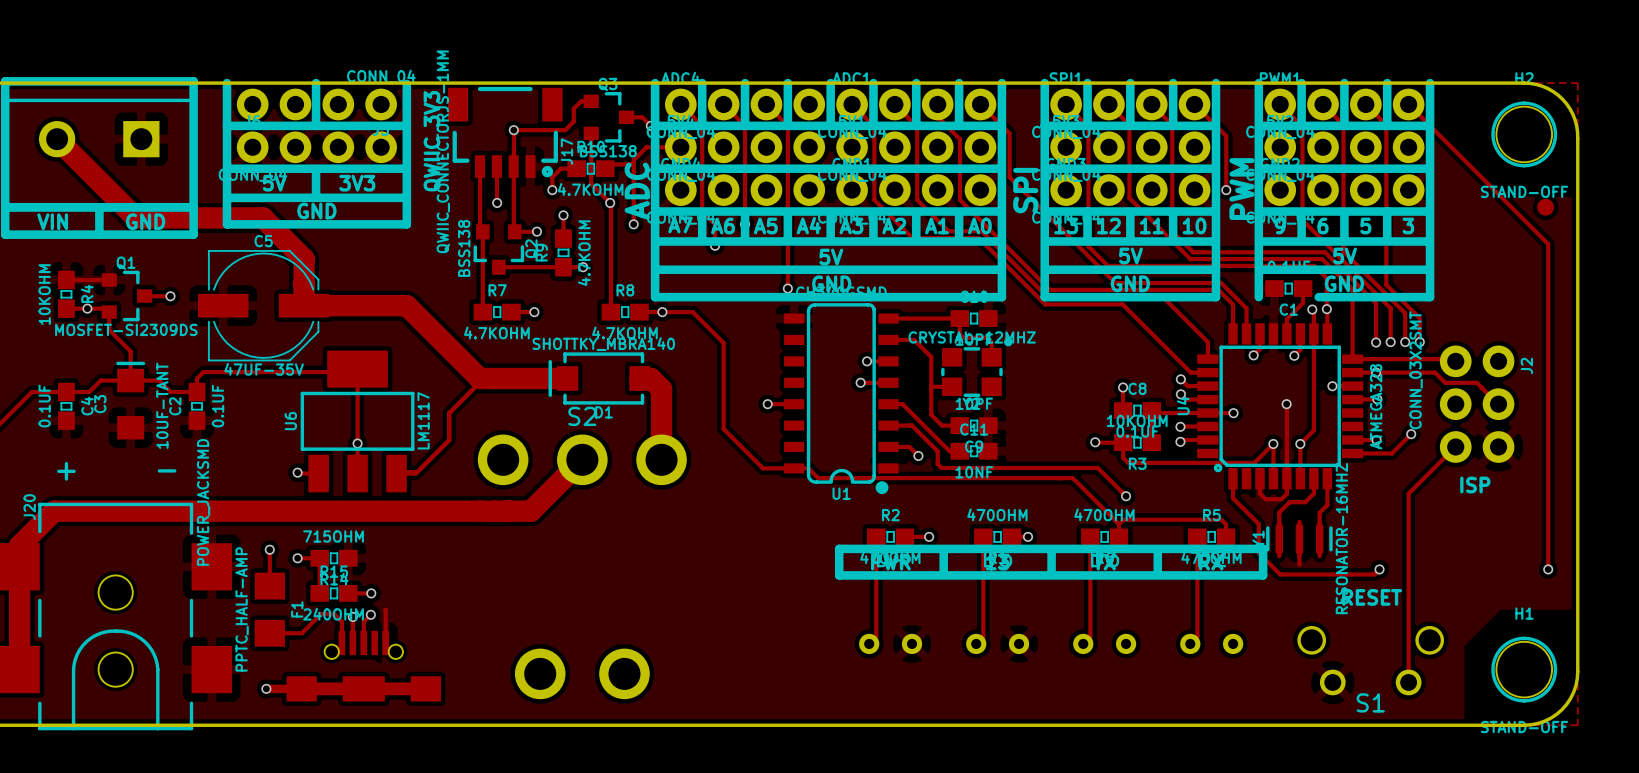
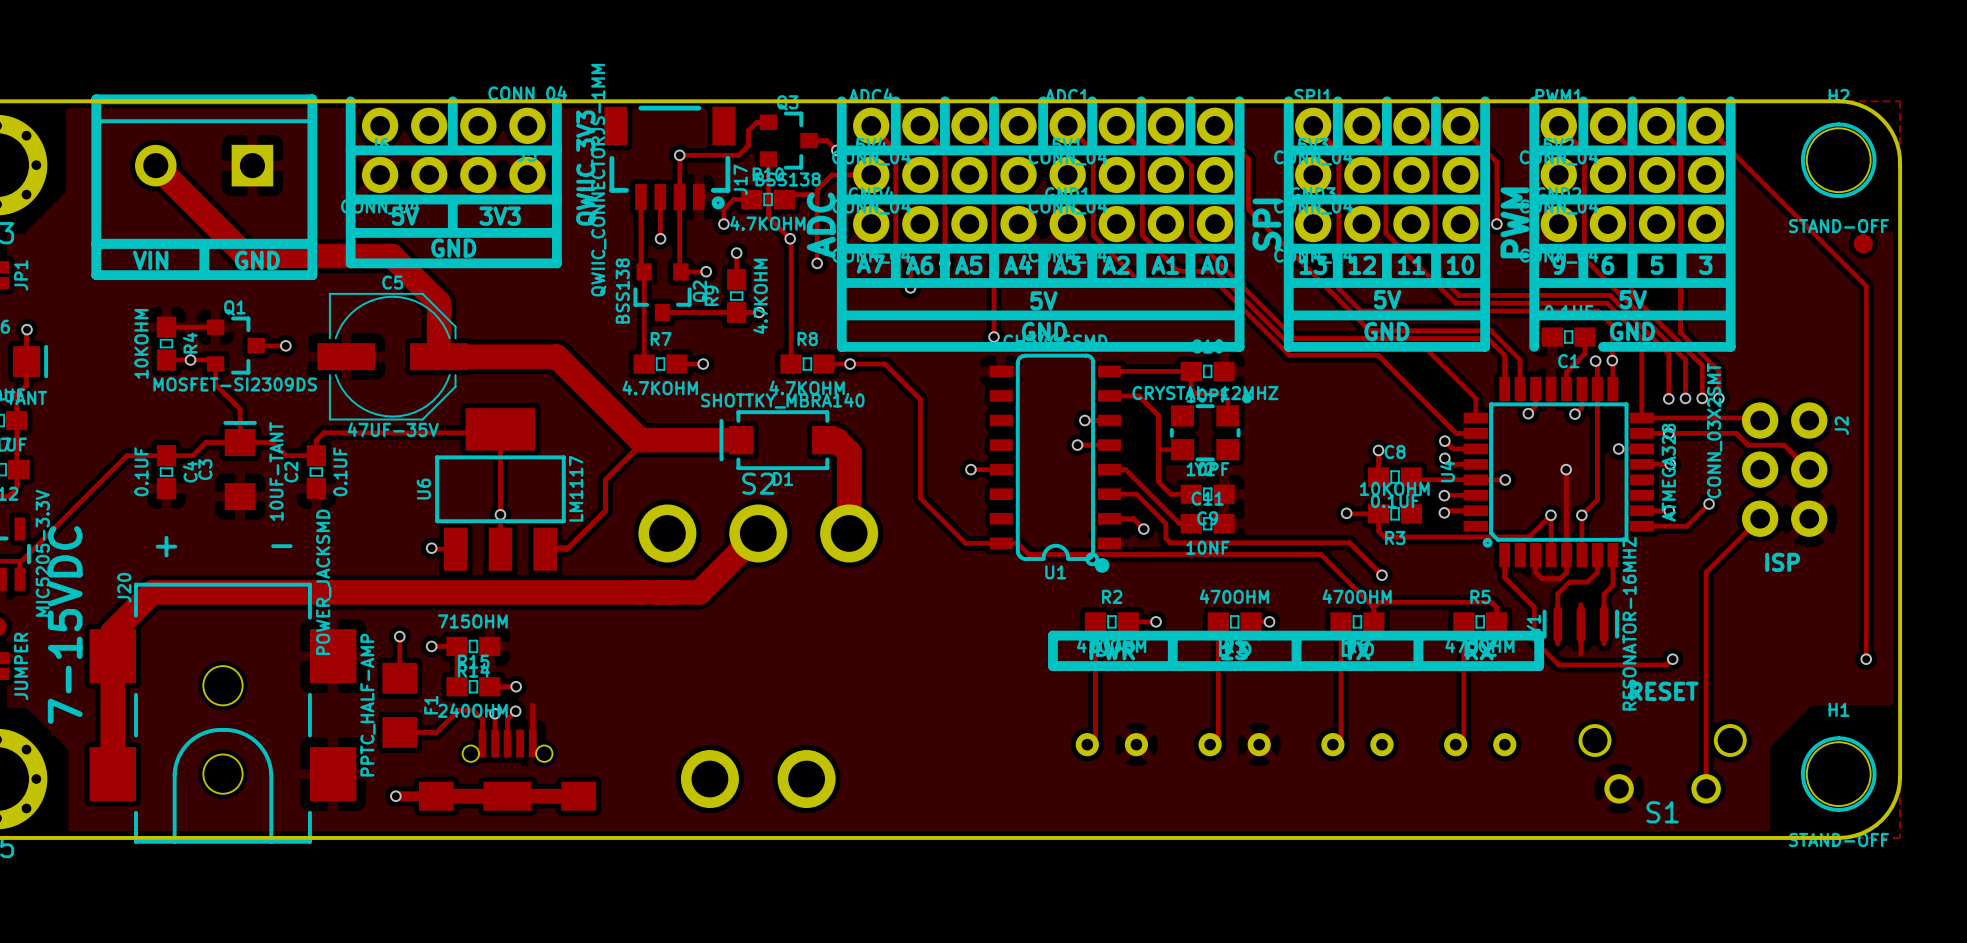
drawing: none -> [1085, 552, 1100, 567]

